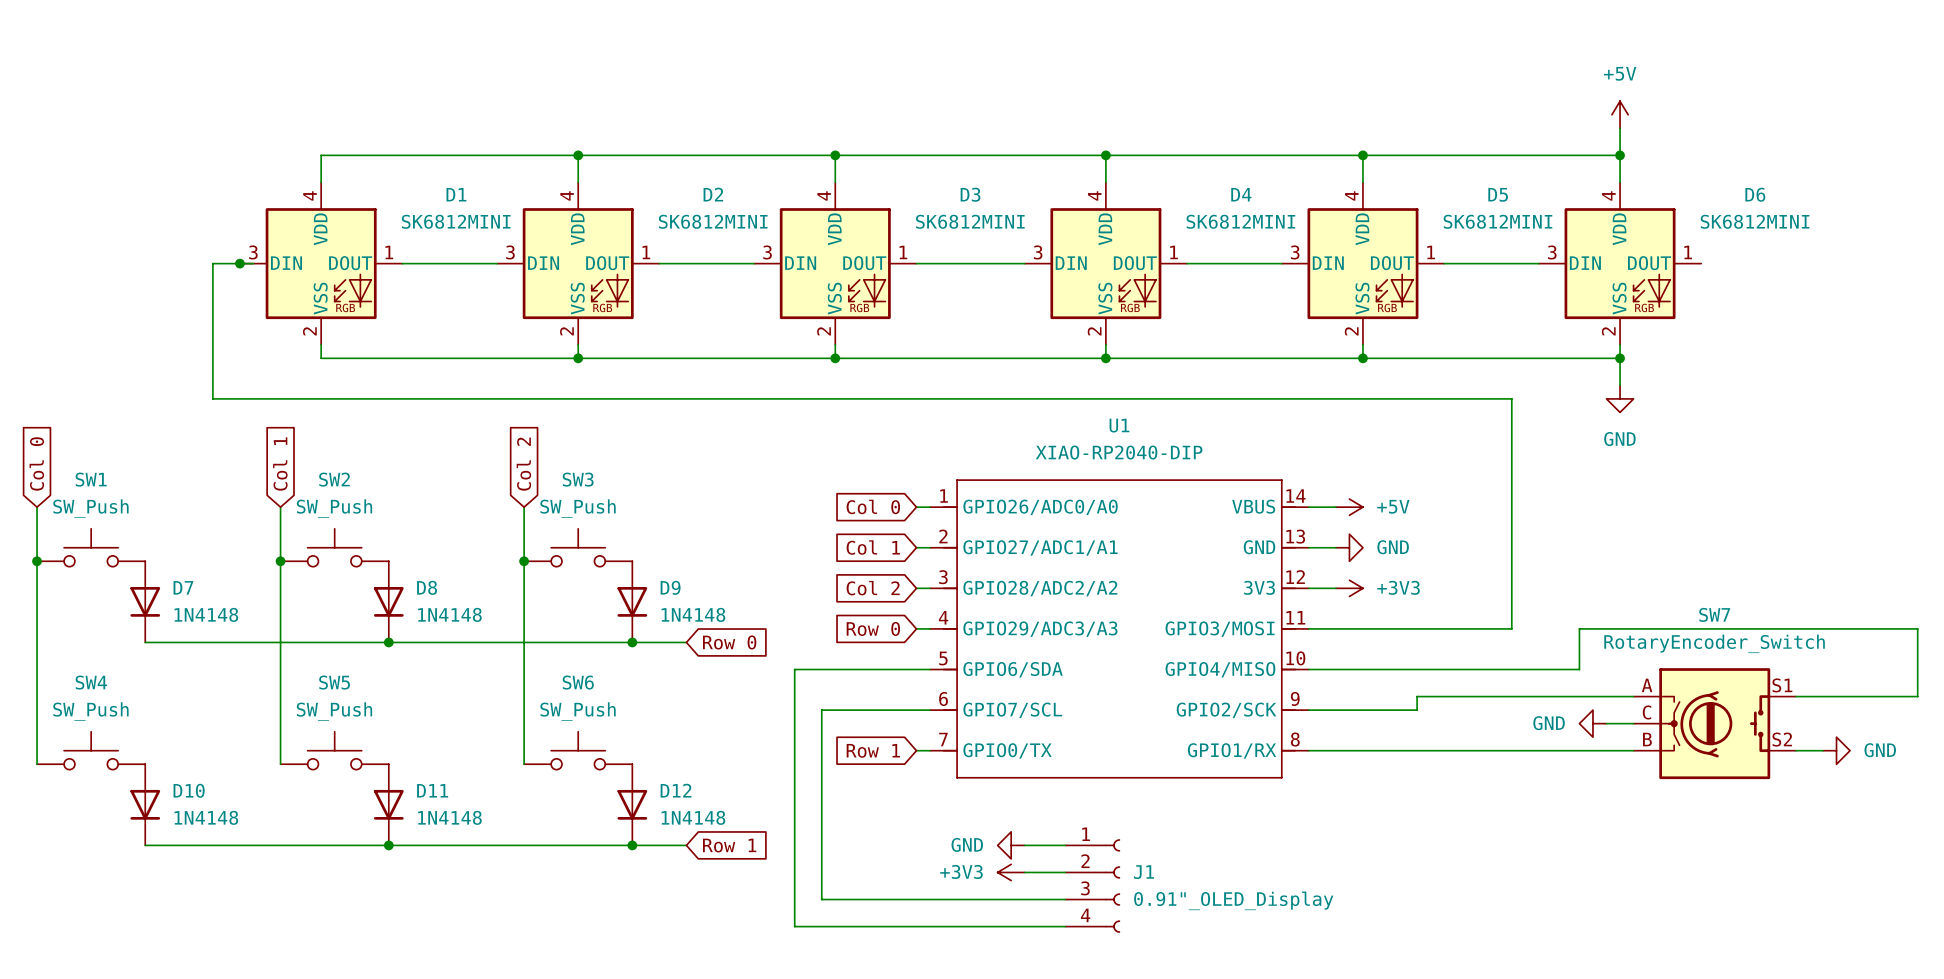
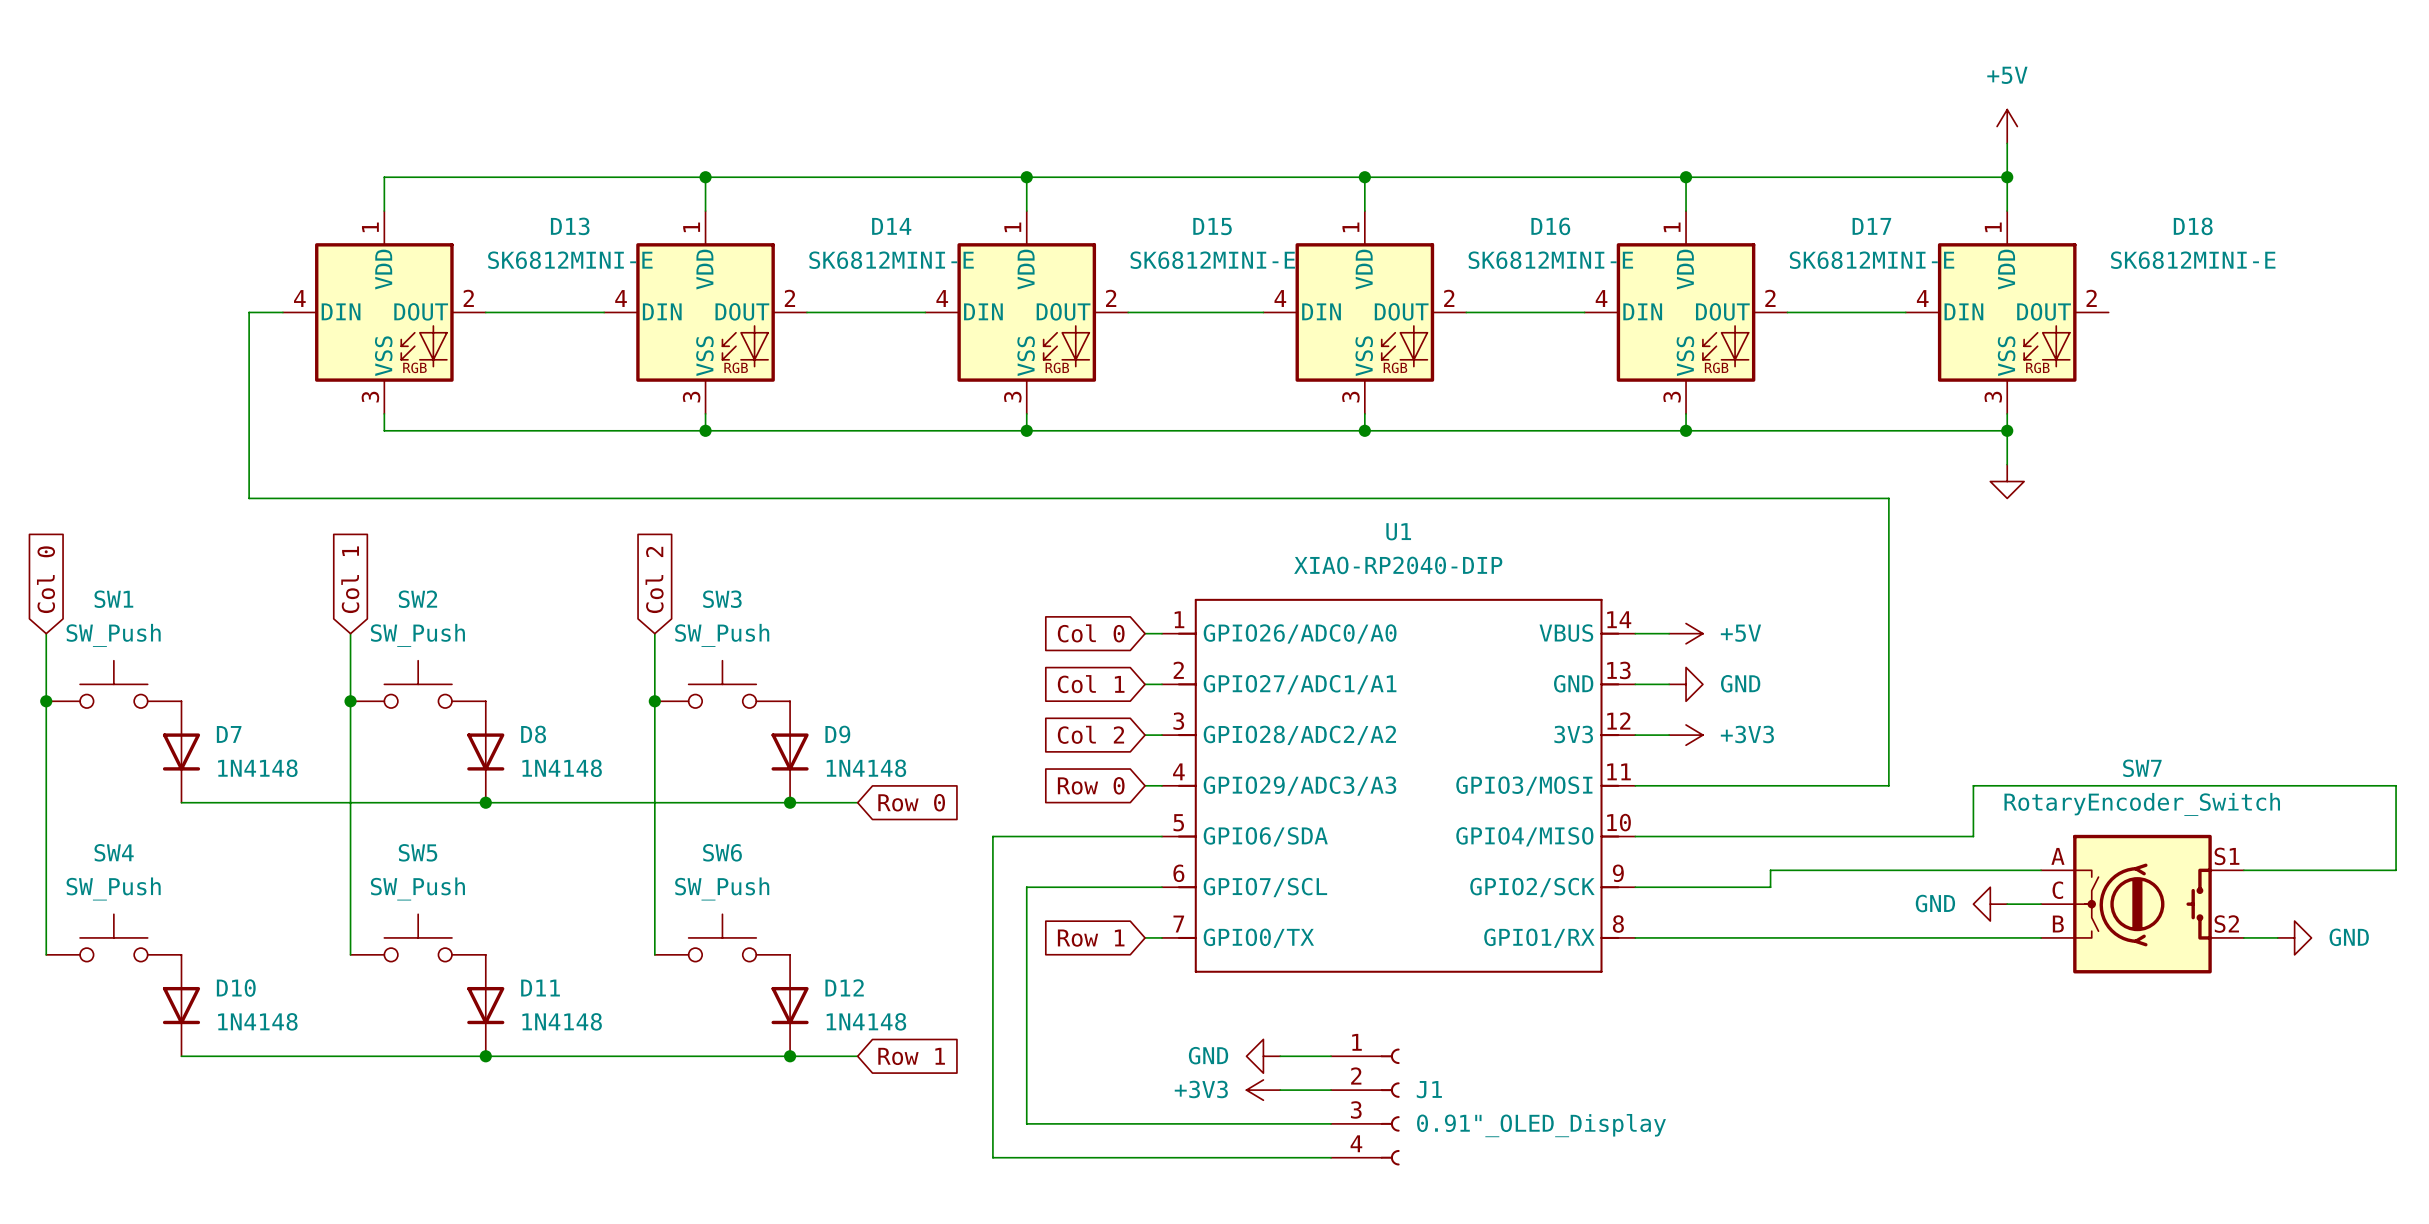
power symbol position: +5V (1620, 114) -> +5V (2007, 126)
wire: (1620, 128) (1620, 182) -> (2007, 143) (2007, 211)
wire: (578, 155) (578, 182) -> (705, 177) (705, 211)
junction position: (578, 155) -> (705, 177)
wire: (835, 155) (835, 182) -> (1026, 177) (1026, 211)
junction position: (835, 155) -> (1026, 177)
wire: (1105, 155) (1105, 182) -> (1364, 177) (1364, 211)
junction position: (1105, 155) -> (1364, 177)
wire: (1362, 155) (1362, 182) -> (1686, 177) (1686, 211)
junction position: (1362, 155) -> (1686, 177)
wire: (1620, 155) (321, 155) (321, 182) -> (2007, 177) (384, 177) (384, 211)
junction position: (1620, 155) -> (2007, 177)
D13: none -> SK6812MINI-E (384, 312)
D14: none -> SK6812MINI-E (705, 312)
D15: none -> SK6812MINI-E (1026, 312)
D16: none -> SK6812MINI-E (1364, 312)
D17: none -> SK6812MINI-E (1686, 312)
D18: none -> SK6812MINI-E (2007, 312)
junction: (239, 263) -> none
wire: (253, 263) (212, 263) (212, 398) -> (282, 312) (249, 312) (249, 498) (266, 498)
D1: SK6812MINI (321, 263) -> none
wire: (402, 263) (497, 263) -> (485, 312) (604, 312)
D2: SK6812MINI (578, 263) -> none
wire: (659, 263) (754, 263) -> (806, 312) (925, 312)
D3: SK6812MINI (835, 263) -> none
wire: (916, 263) (1024, 263) -> (1128, 312) (1263, 312)
D4: SK6812MINI (1105, 263) -> none
wire: (1187, 263) (1281, 263) -> (1466, 312) (1584, 312)
D5: SK6812MINI (1362, 263) -> none
wire: (1444, 263) (1538, 263) -> (1787, 312) (1905, 312)
D6: SK6812MINI (1620, 263) -> none
wire: (321, 344) (321, 358) (1620, 358) -> (384, 413) (384, 430) (2007, 430)
wire: (578, 344) (578, 358) -> (705, 413) (705, 430)
wire: (835, 344) (835, 358) -> (1026, 413) (1026, 430)
wire: (1105, 344) (1105, 358) -> (1364, 413) (1364, 430)
wire: (1362, 344) (1362, 358) -> (1686, 413) (1686, 430)
wire: (1620, 344) (1620, 385) -> (2007, 413) (2007, 464)
junction position: (578, 358) -> (705, 430)
junction position: (835, 358) -> (1026, 430)
junction position: (1105, 358) -> (1364, 430)
junction position: (1362, 358) -> (1686, 430)
junction position: (1620, 358) -> (2007, 430)
power symbol: none -> (2007, 481)
power symbol: GND (1620, 398) -> none

